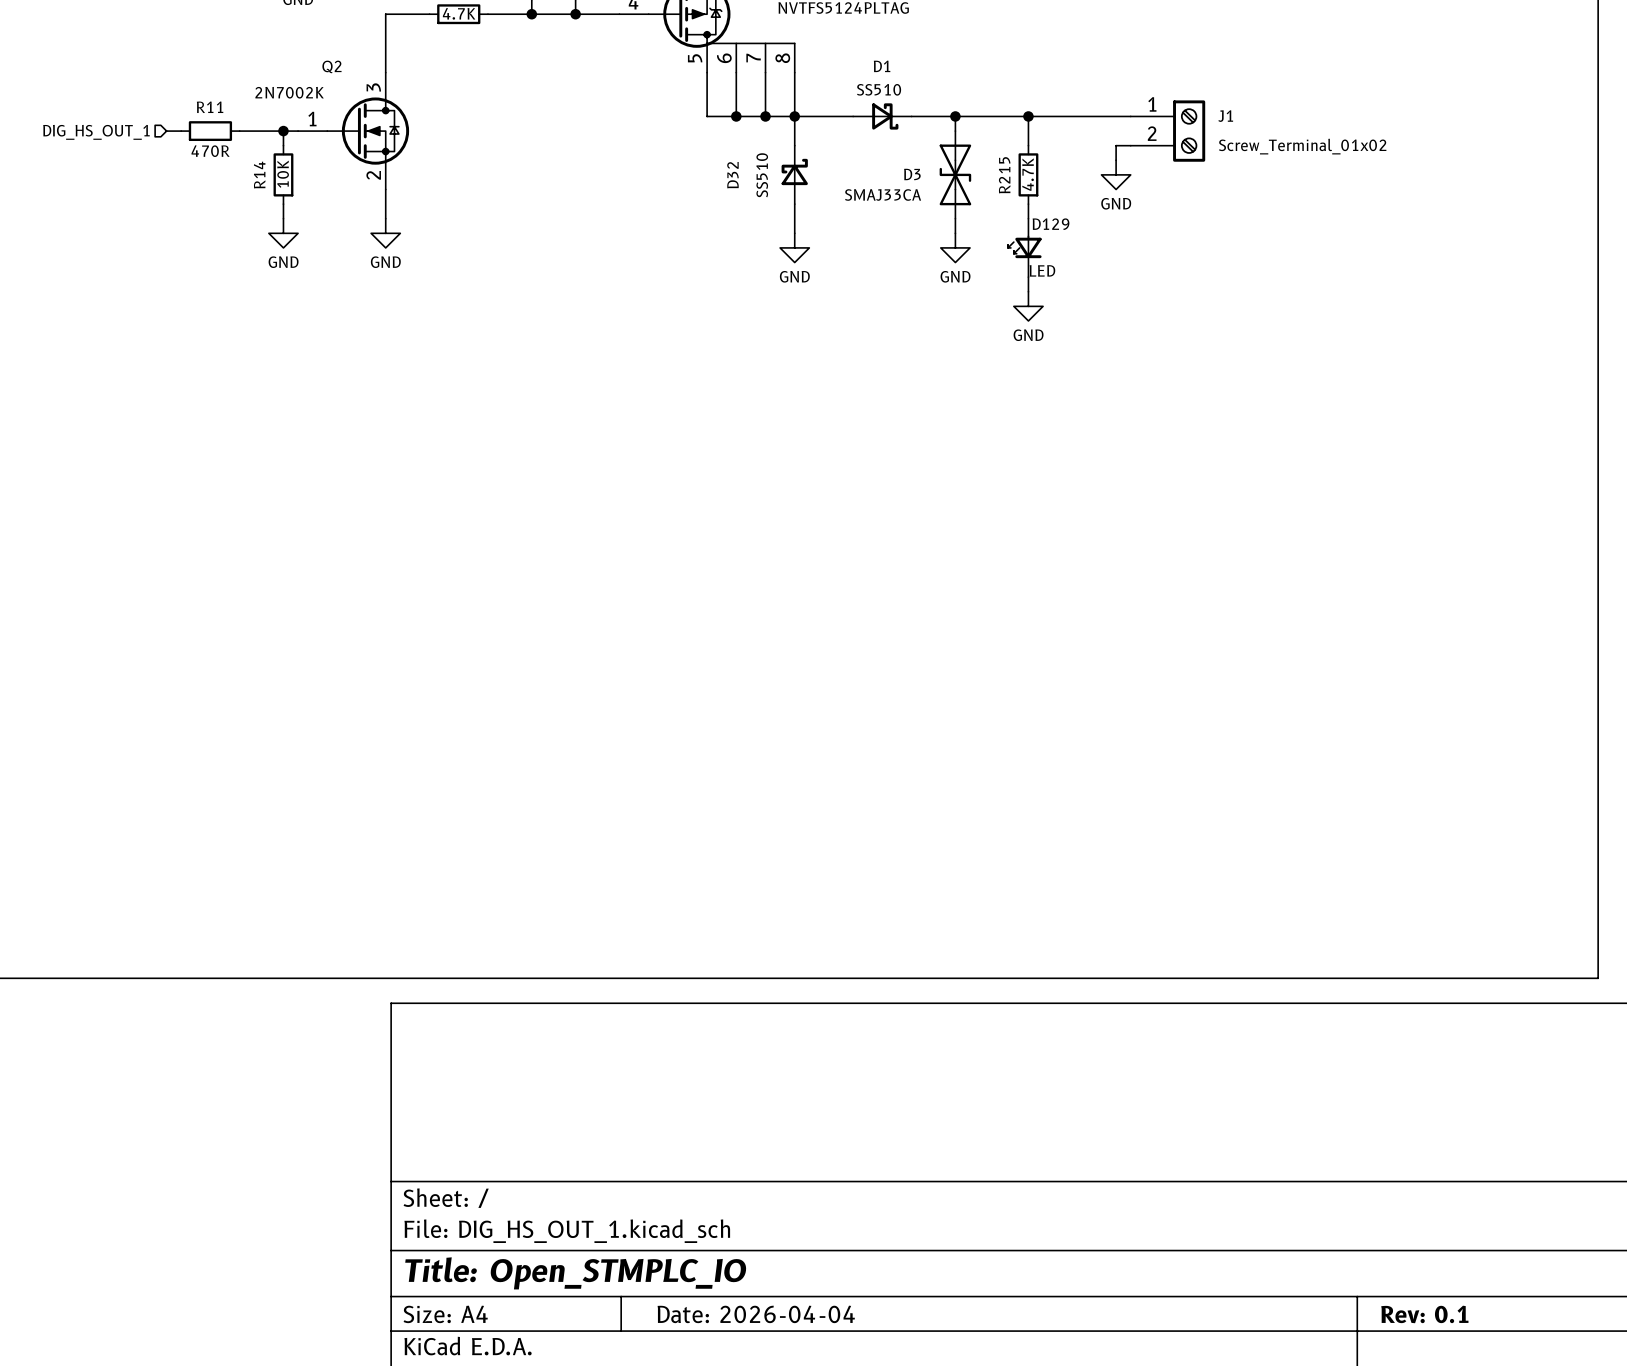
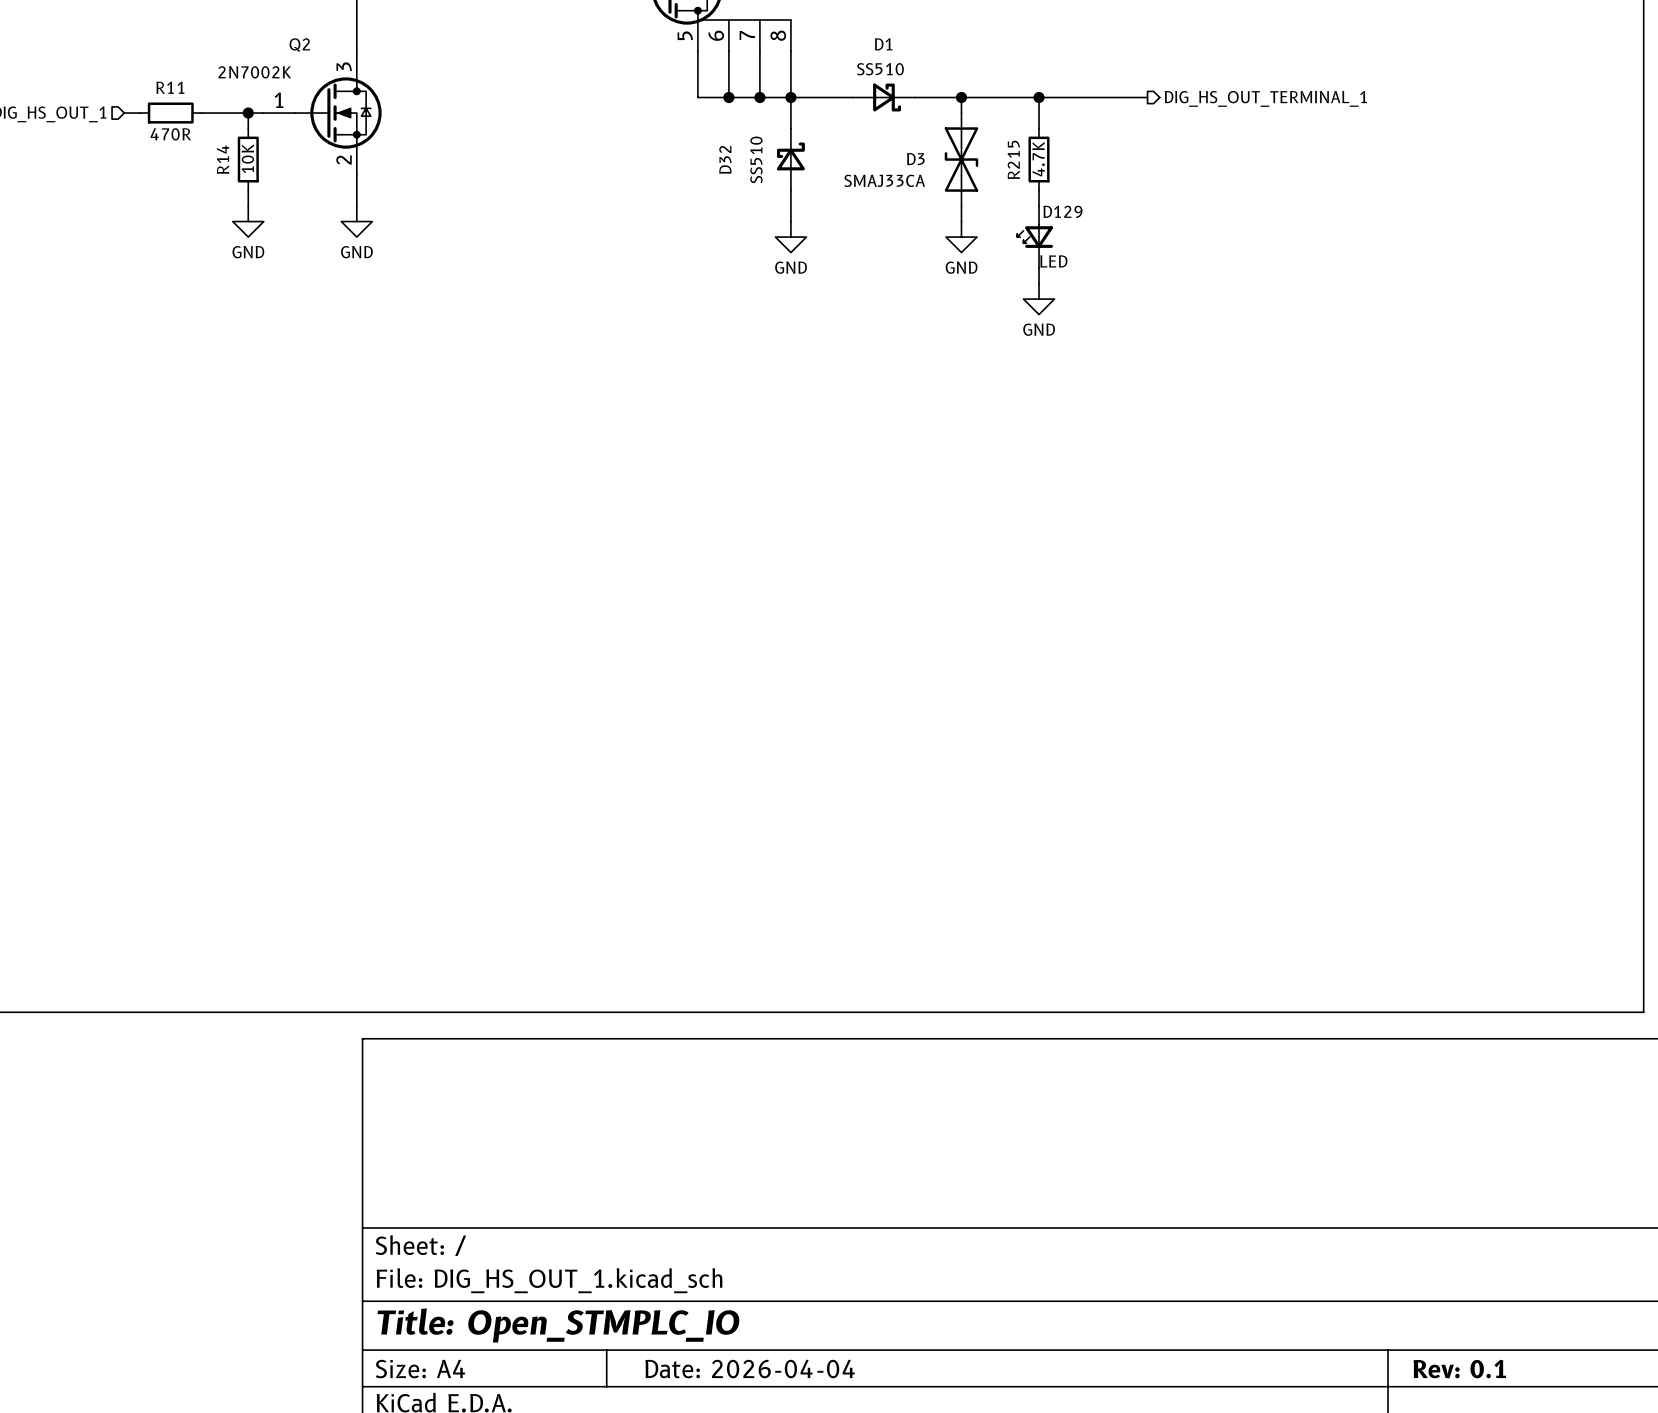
hierarchical label: none -> DIG_HS_OUT_TERMINAL_1 (1265, 98)
J1: Screw_Terminal_01x02 (1167, 131) -> none
wire: (1130, 145) (1116, 145) (1116, 160) -> none
power symbol: GND (1116, 174) -> none

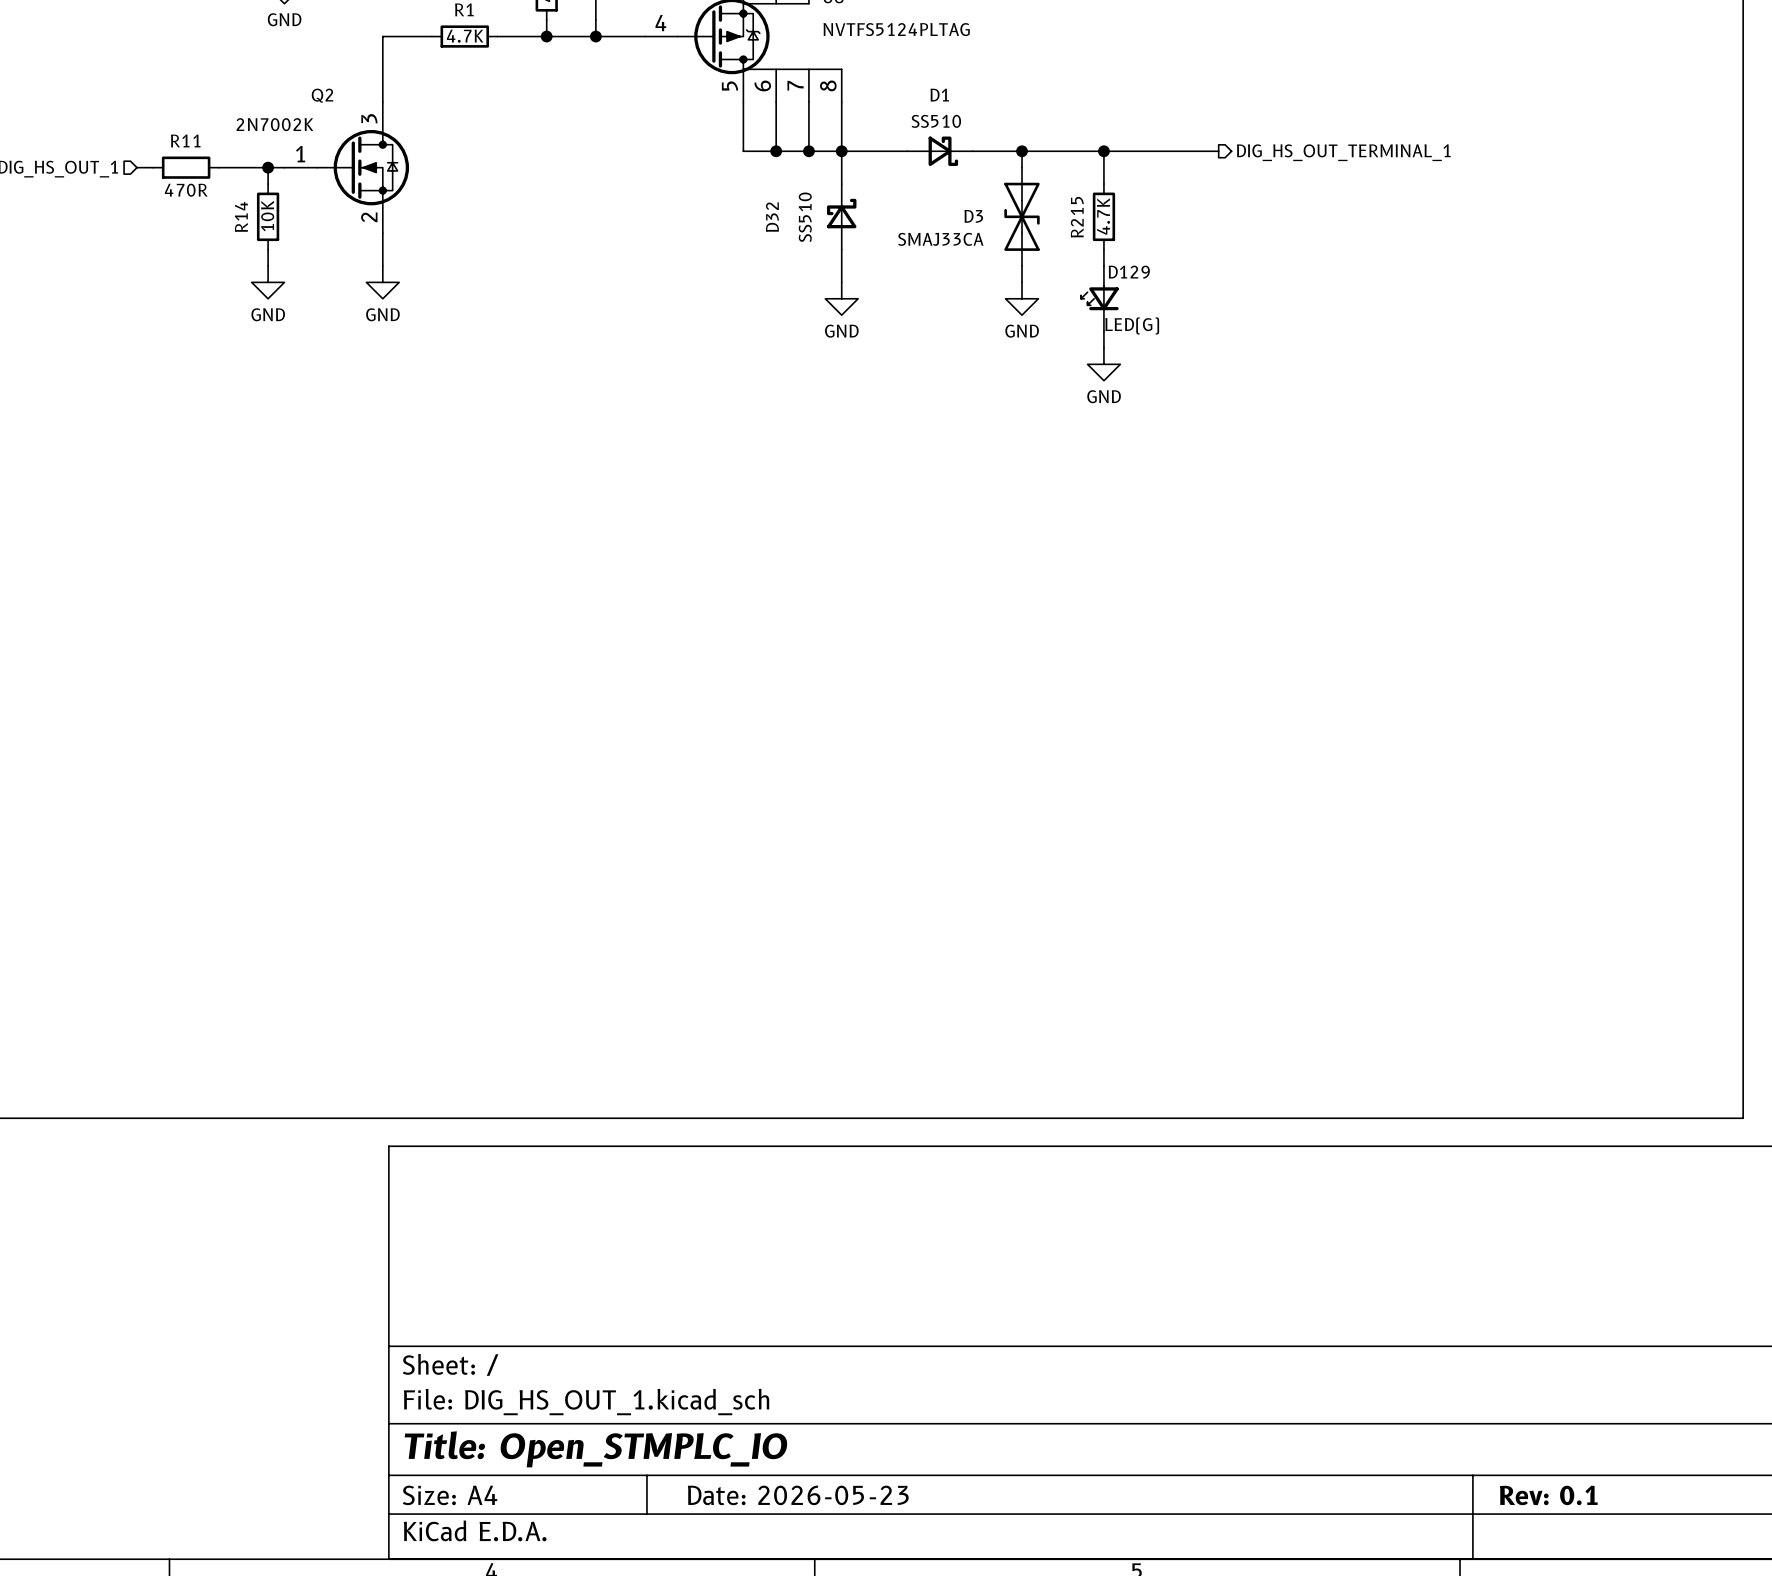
D129 value: LED (1053, 261) -> LED(G) (1132, 325)
title block: Date: 2026-04-04 (750, 1369) -> Date: 2026-05-23 (798, 1495)

